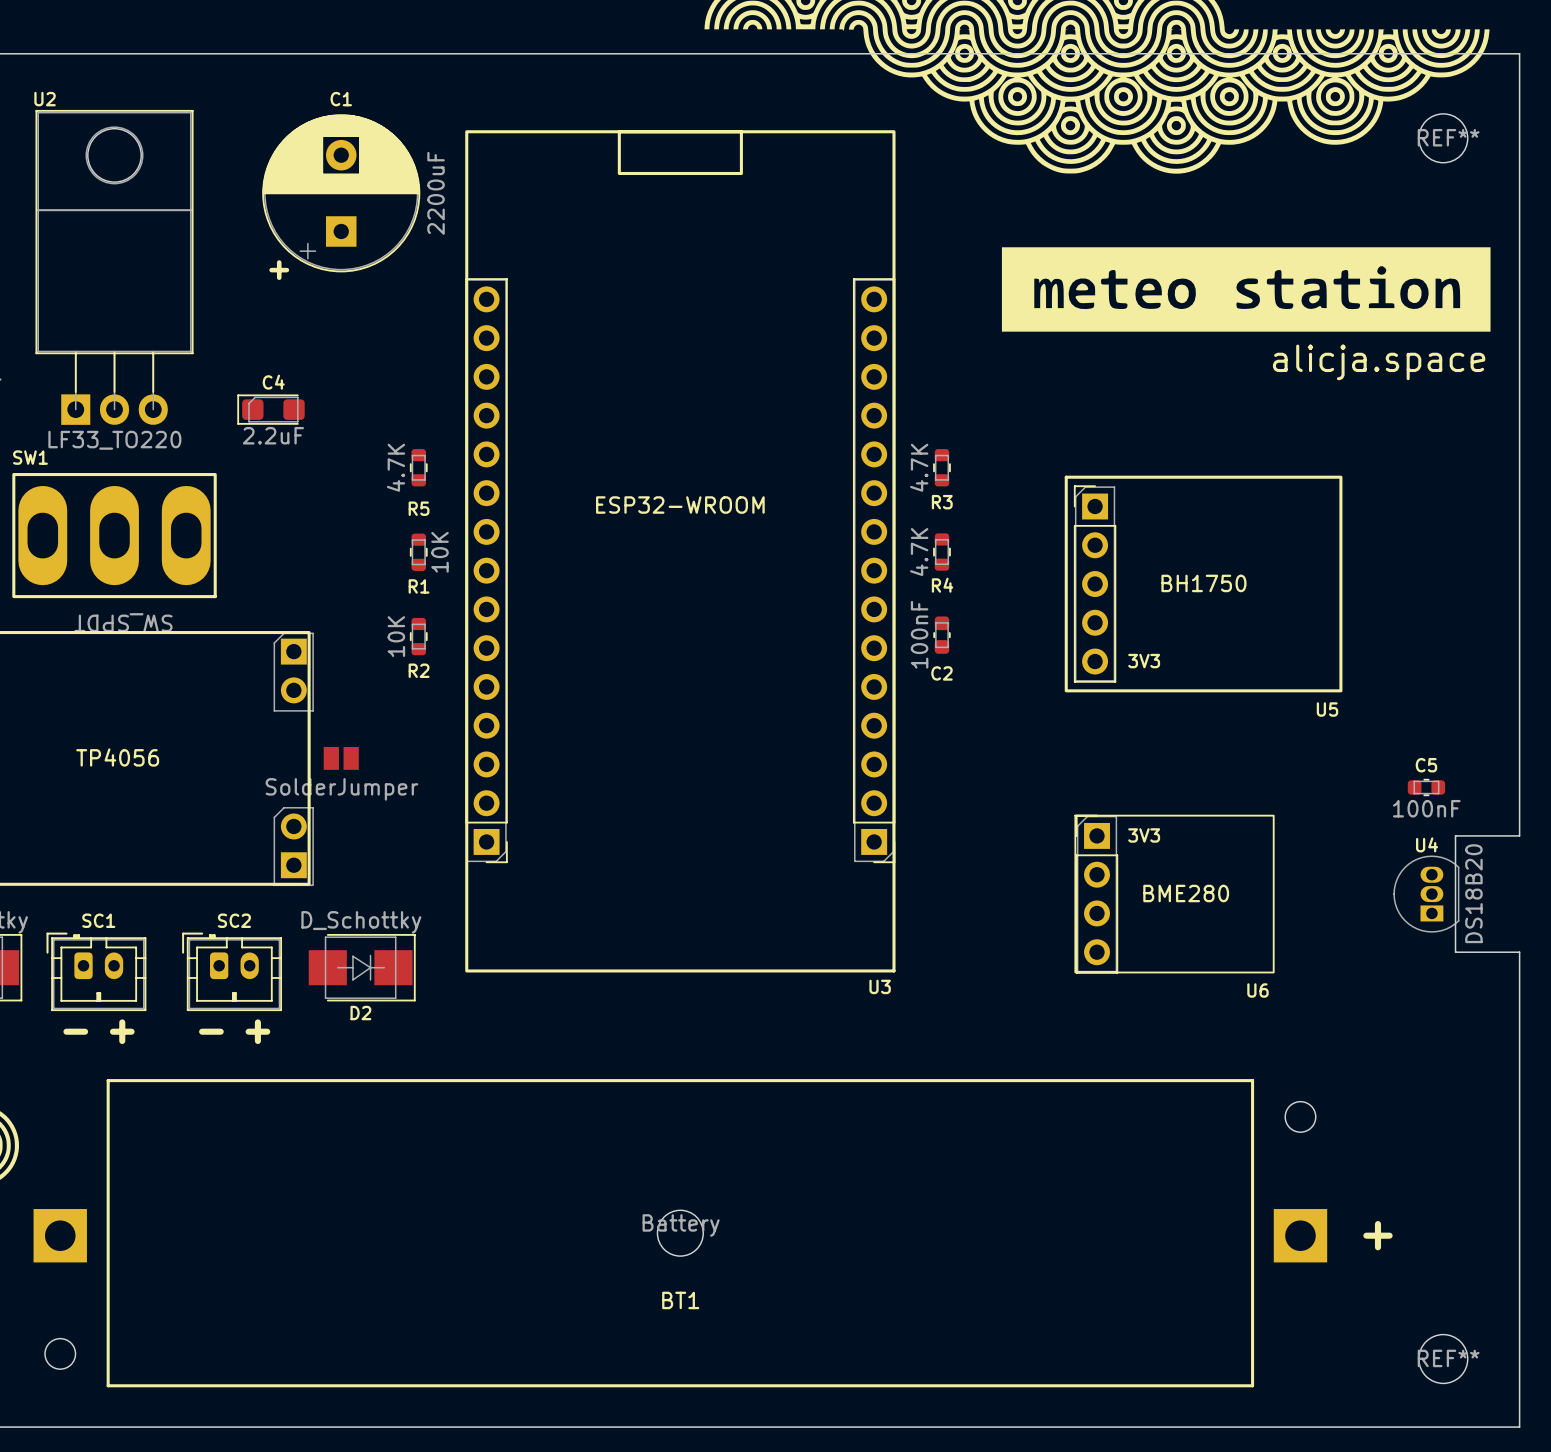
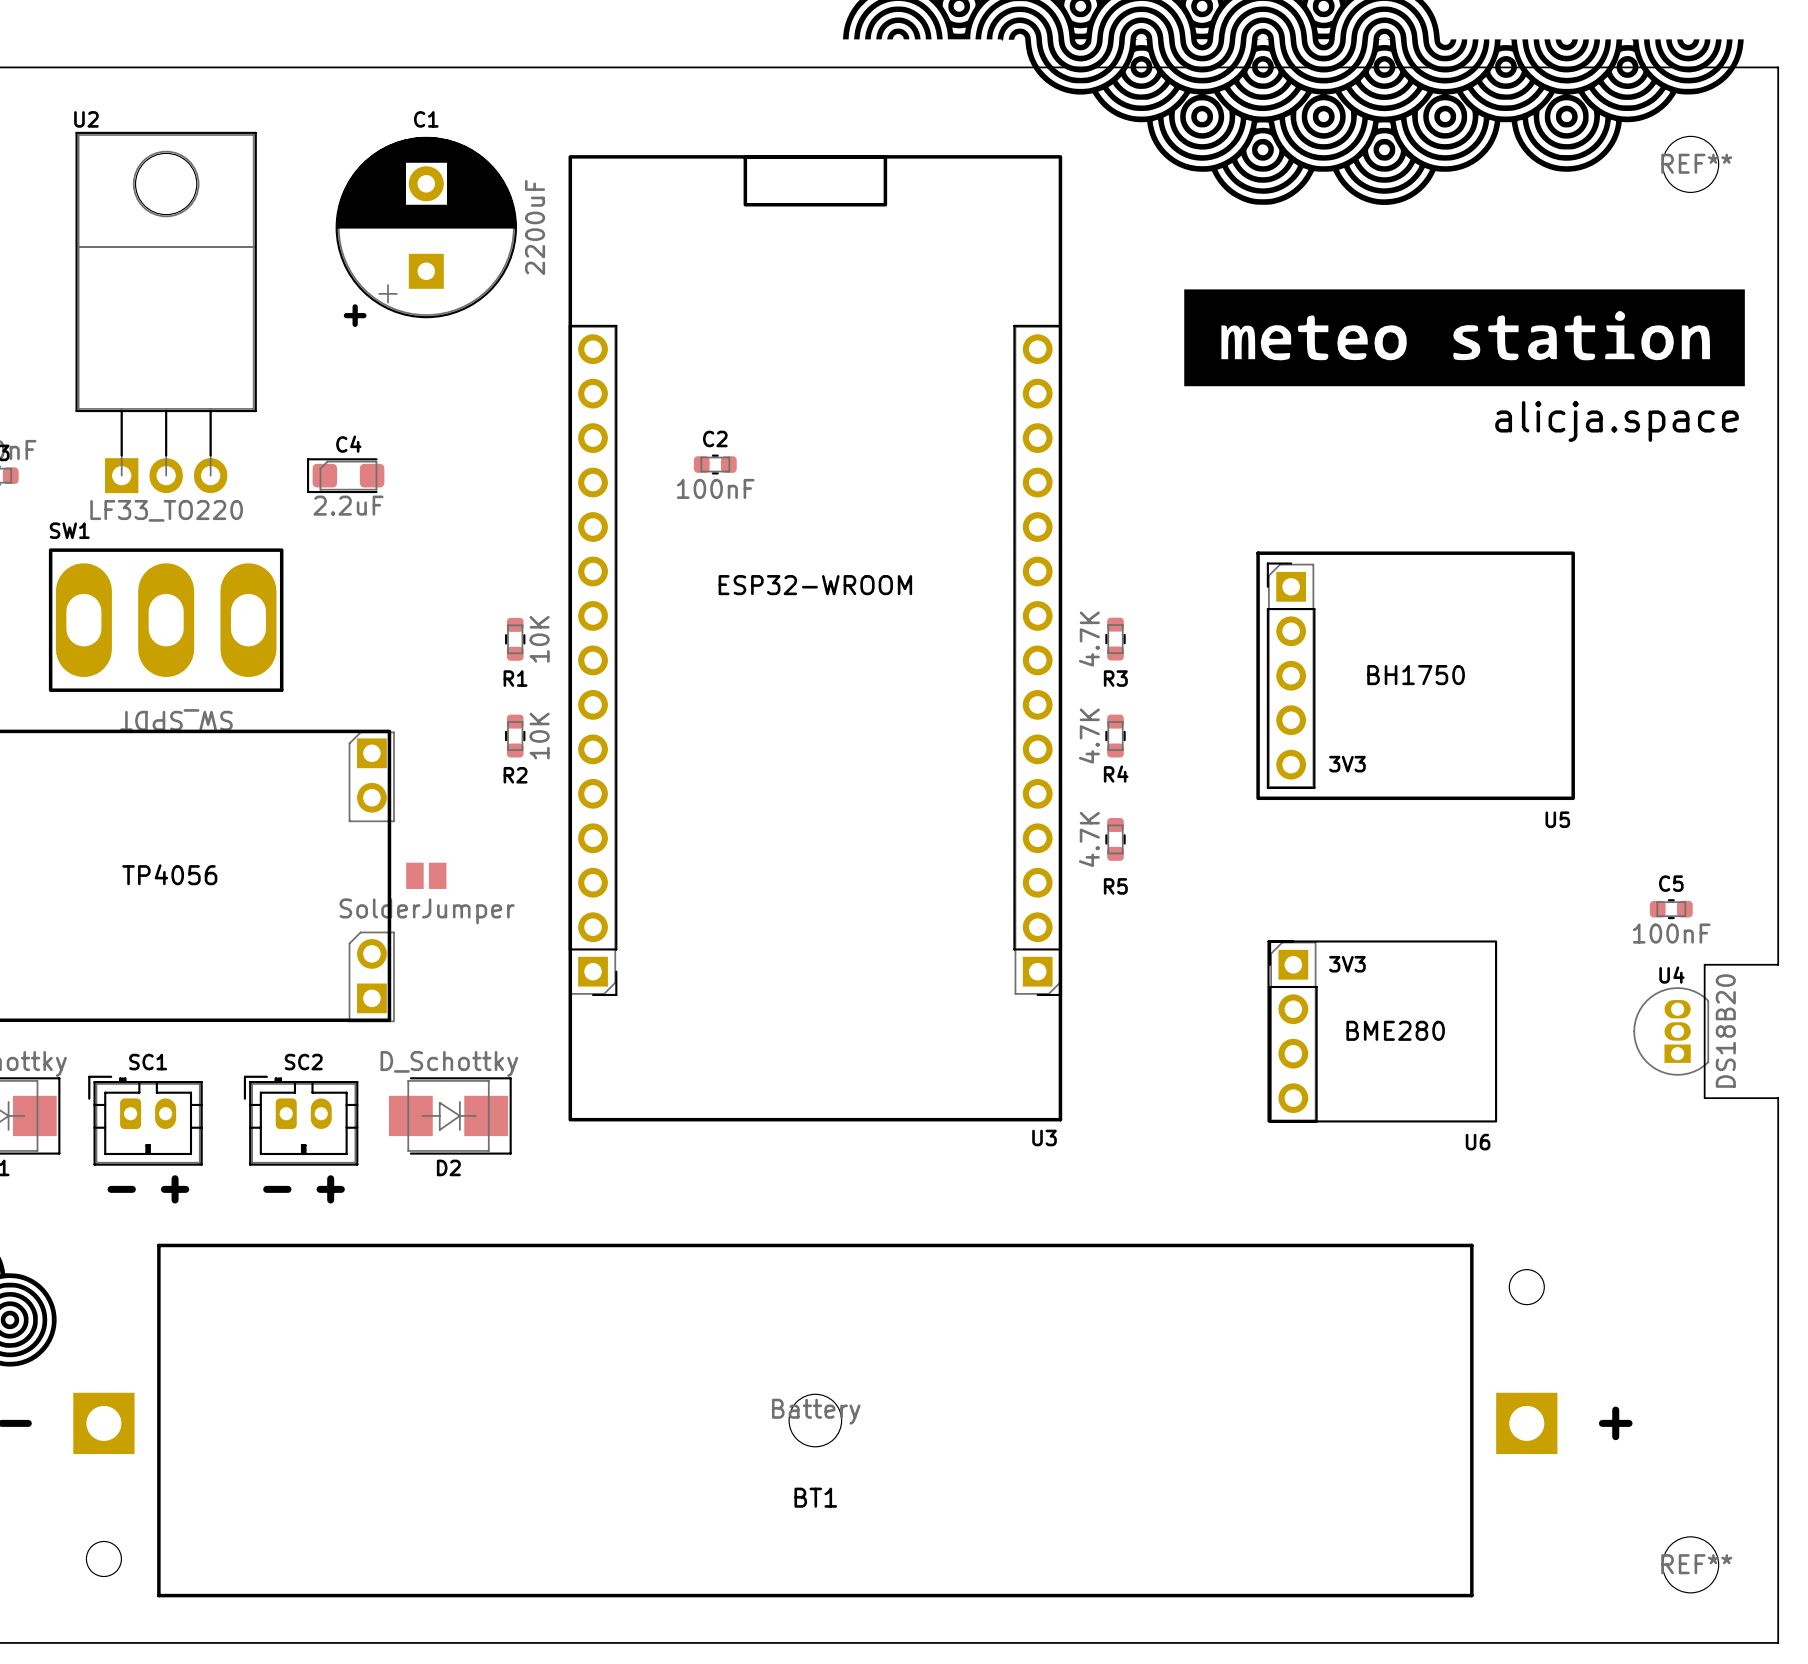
R5 position: (418, 467) -> (1115, 839)
R3: 4.7K (941, 467) -> none
R4 name: R4 (942, 585) -> R3 (1115, 678)
C2 value position: 100nF (919, 634) -> 100nF (715, 488)
C2 rotation: 0° (941, 635) -> 90° clockwise (715, 464)
C2 position: (941, 635) -> (715, 464)
R2 value position: 10K (396, 636) -> 10K (539, 736)
R4: none -> 4.7K (1115, 736)
C2 name position: C2 (941, 673) -> C2 (715, 438)

